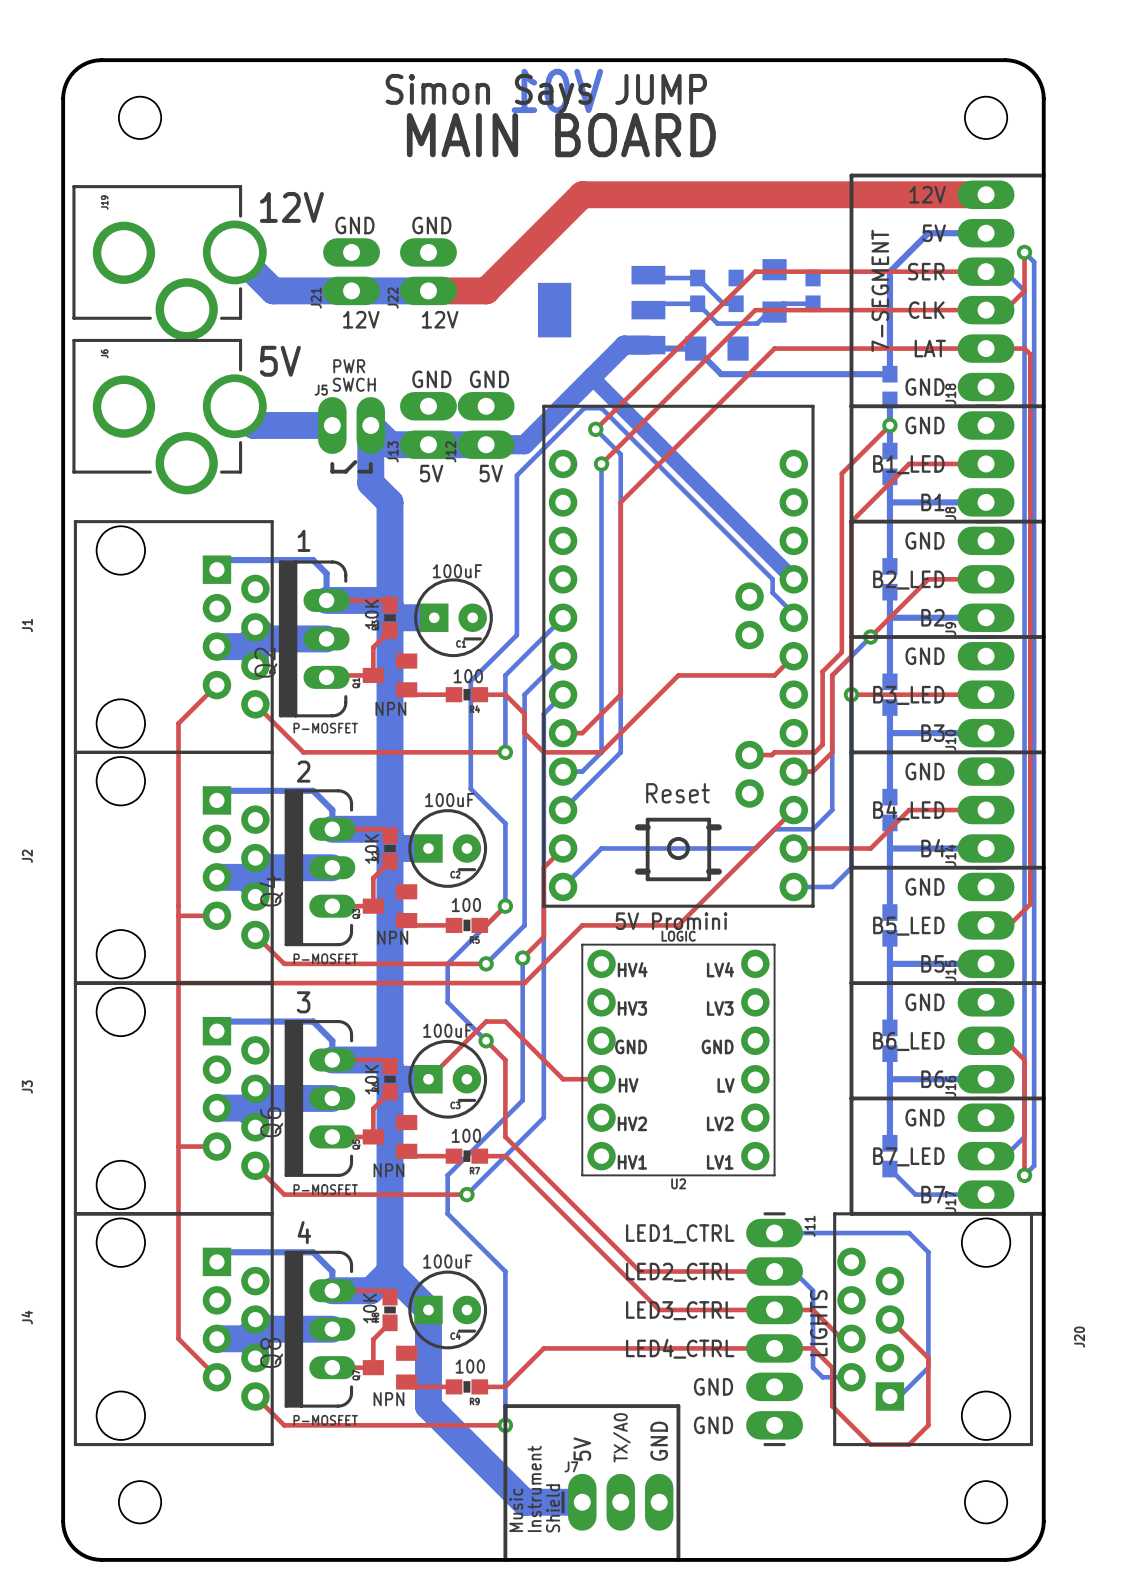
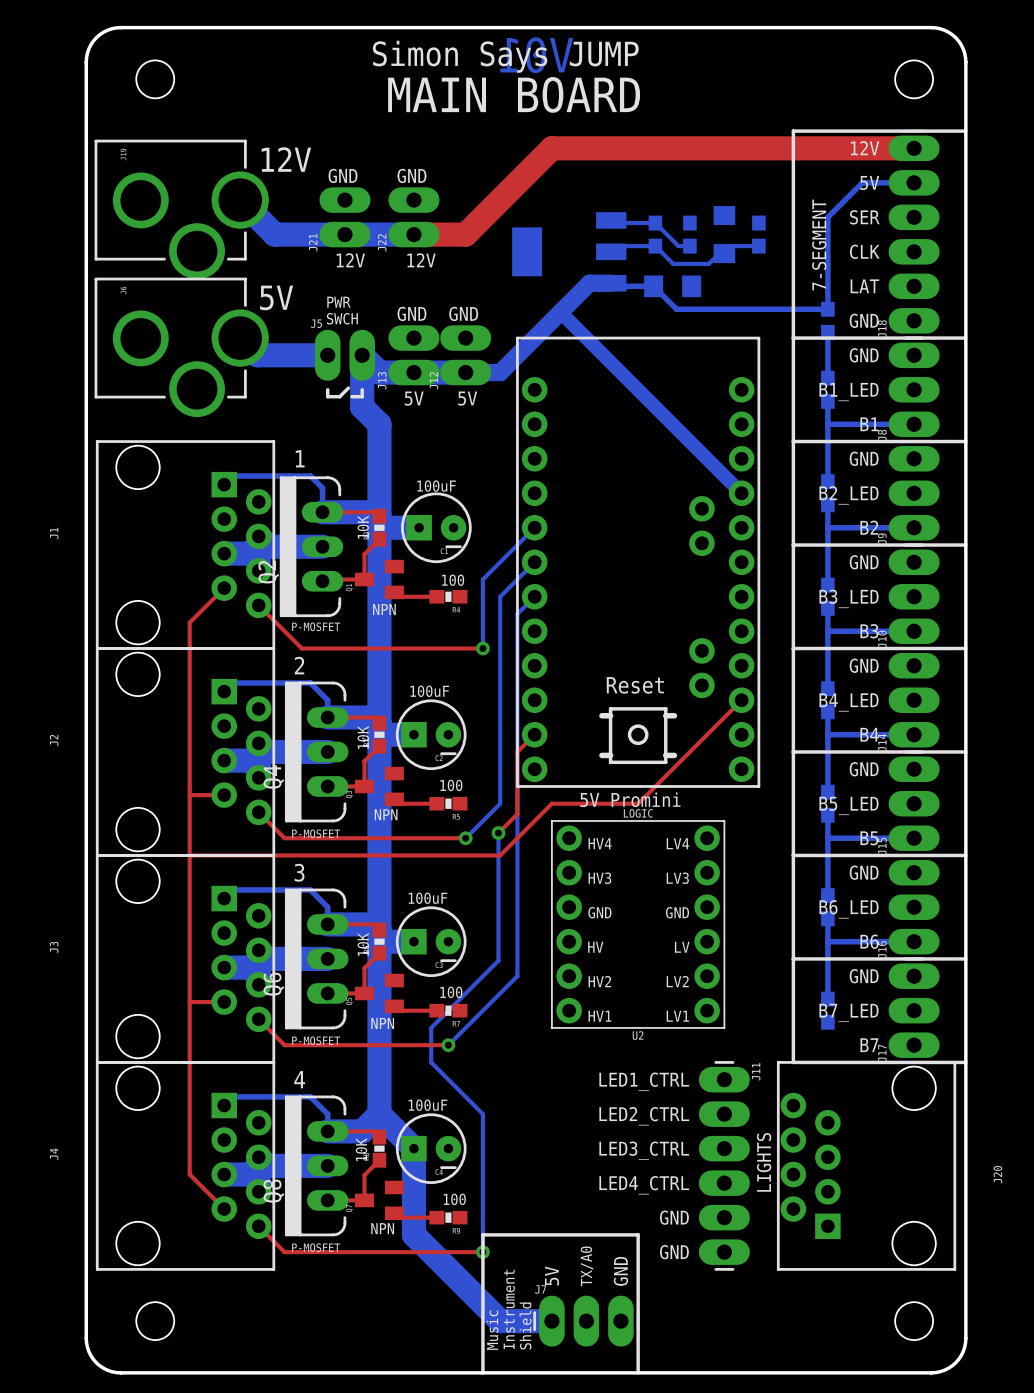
bottom track: (1024, 252) (1034, 262) (1034, 1165) (1024, 1175) -> none
top track: (1024, 252) (1024, 290) (1005, 310) (755, 310) (601, 463) -> none
via: (1024, 252) -> none
bottom track: (986, 271) (1005, 271) (1024, 290) (1024, 1136) (1005, 1156) (986, 1156) -> none
top track: (986, 271) (755, 271) (595, 429) -> none
top track: (889, 425) (841, 473) (841, 652) (822, 671) (822, 744) (814, 752) (774, 752) (771, 755) (749, 755) -> none
via: (889, 425) -> none
bottom track: (595, 429) (620, 454) (620, 752) (563, 810) -> none
via: (595, 429) -> none
bottom track: (601, 463) (601, 752) (582, 771) (563, 771) -> none
via: (601, 463) -> none
top track: (986, 463) (909, 463) (851, 521) (851, 656) (832, 675) (832, 752) (813, 771) (793, 771) -> none
top track: (986, 579) (928, 579) (870, 637) -> none
bottom track: (793, 617) (793, 613) (772, 592) (772, 579) (601, 408) (584, 408) (516, 475) (516, 635) (470, 681) (470, 788) (505, 823) (505, 906) (447, 963) (447, 1002) (486, 1040) -> none
bottom track: (870, 637) (832, 675) (832, 810) (813, 829) (774, 829) (755, 848) (601, 848) (563, 886) -> none
via: (870, 637) -> none
top track: (793, 656) (774, 675) (678, 675) (601, 752) (543, 752) (524, 733) (524, 713) (505, 694) (479, 694) -> none
bottom track: (851, 694) (851, 867) (832, 886) (793, 886) -> none
top track: (851, 694) (986, 694) -> none
via: (851, 694) -> none
top track: (563, 733) (582, 733) (620, 694) (620, 502) (774, 348) (1024, 348) (1030, 354) (1030, 904) (1009, 925) (986, 925) -> none
top track: (986, 810) (909, 810) (870, 848) (793, 848) -> none
top track: (505, 906) (486, 925) (479, 925) -> none
via: (505, 906) -> none
top track: (486, 1040) (505, 1060) (505, 1136) (639, 1271) (774, 1271) -> none
via: (486, 1040) -> none
top track: (986, 1040) (1005, 1040) (1024, 1060) (1024, 1175) -> none
top track: (428, 1079) (486, 1021) (505, 1021) (563, 1079) (601, 1079) -> none
top track: (479, 1156) (505, 1156) (659, 1309) (813, 1309) (841, 1338) (851, 1338) -> none
bottom track: (889, 1169) (915, 1194) (986, 1194) -> none
via: (1024, 1175) -> none
bottom track: (774, 1233) (909, 1233) (928, 1252) (928, 1367) (899, 1396) (889, 1396) -> none
bottom track: (774, 1271) (793, 1271) (813, 1290) (813, 1367) (822, 1377) (851, 1377) -> none
top track: (889, 1319) (928, 1358) (928, 1425) (909, 1444) (870, 1444) (832, 1406) (832, 1367) (813, 1348) (543, 1348) (505, 1386) (479, 1386) -> none

